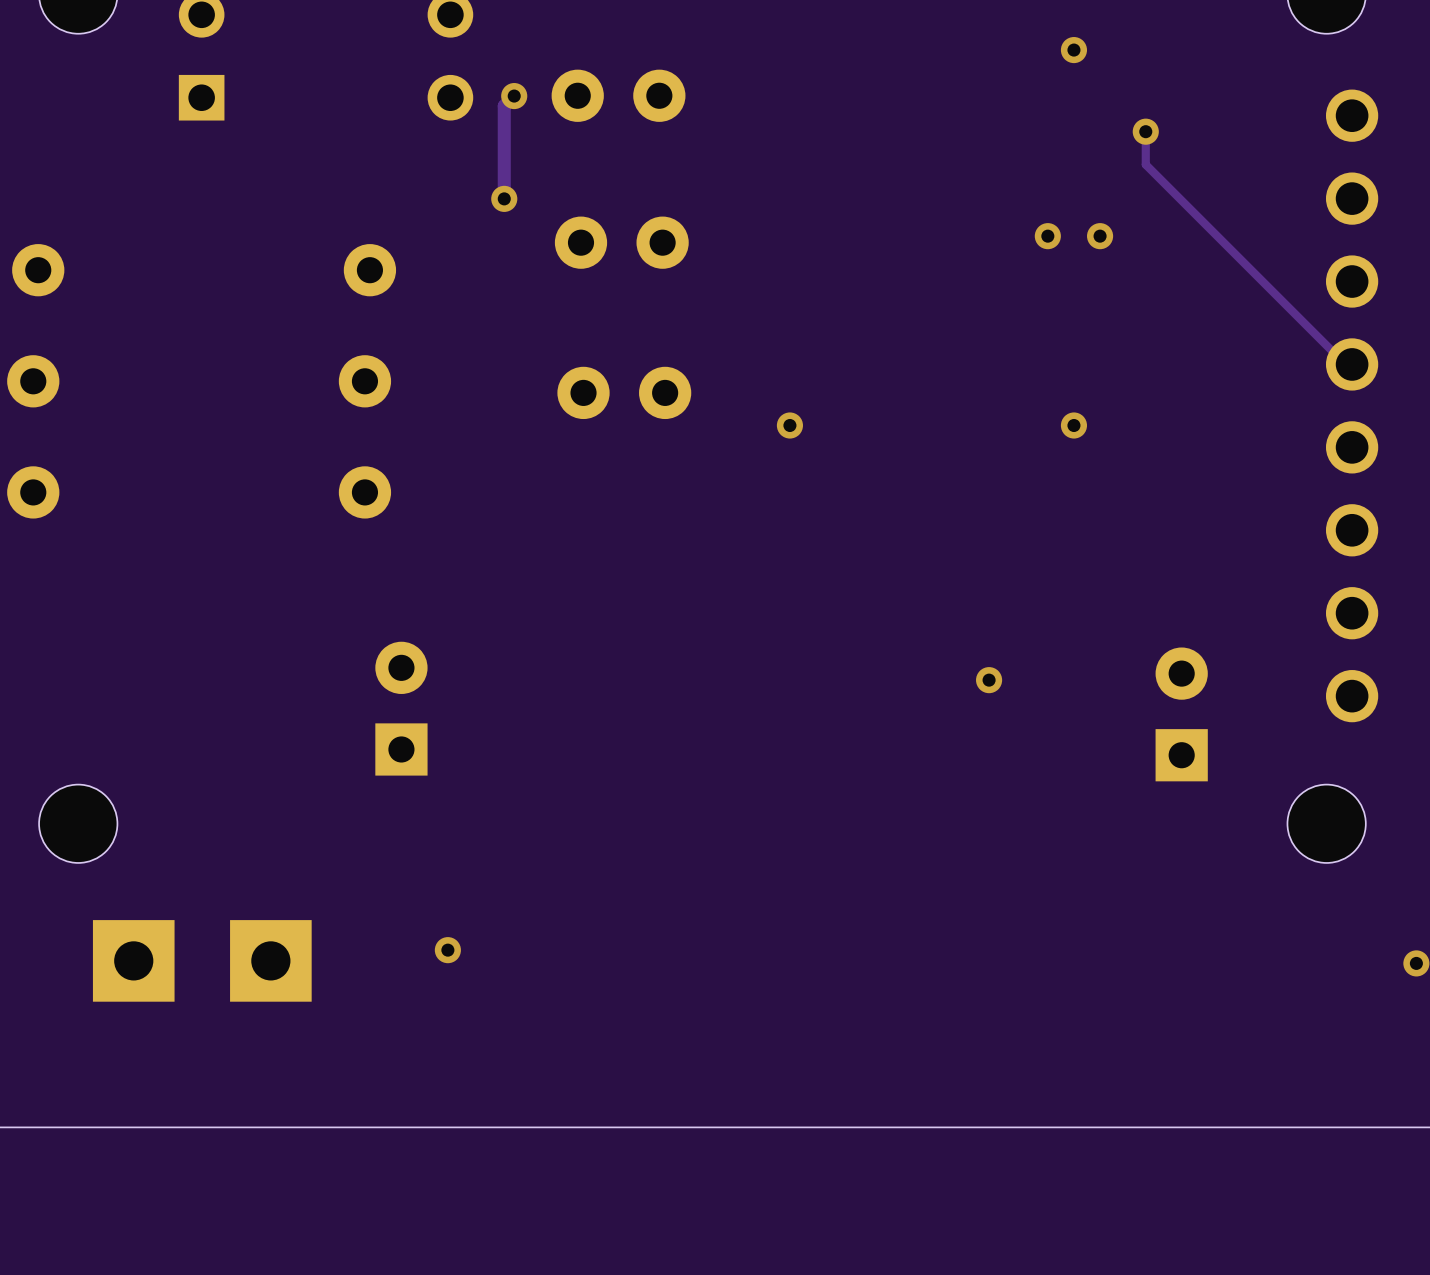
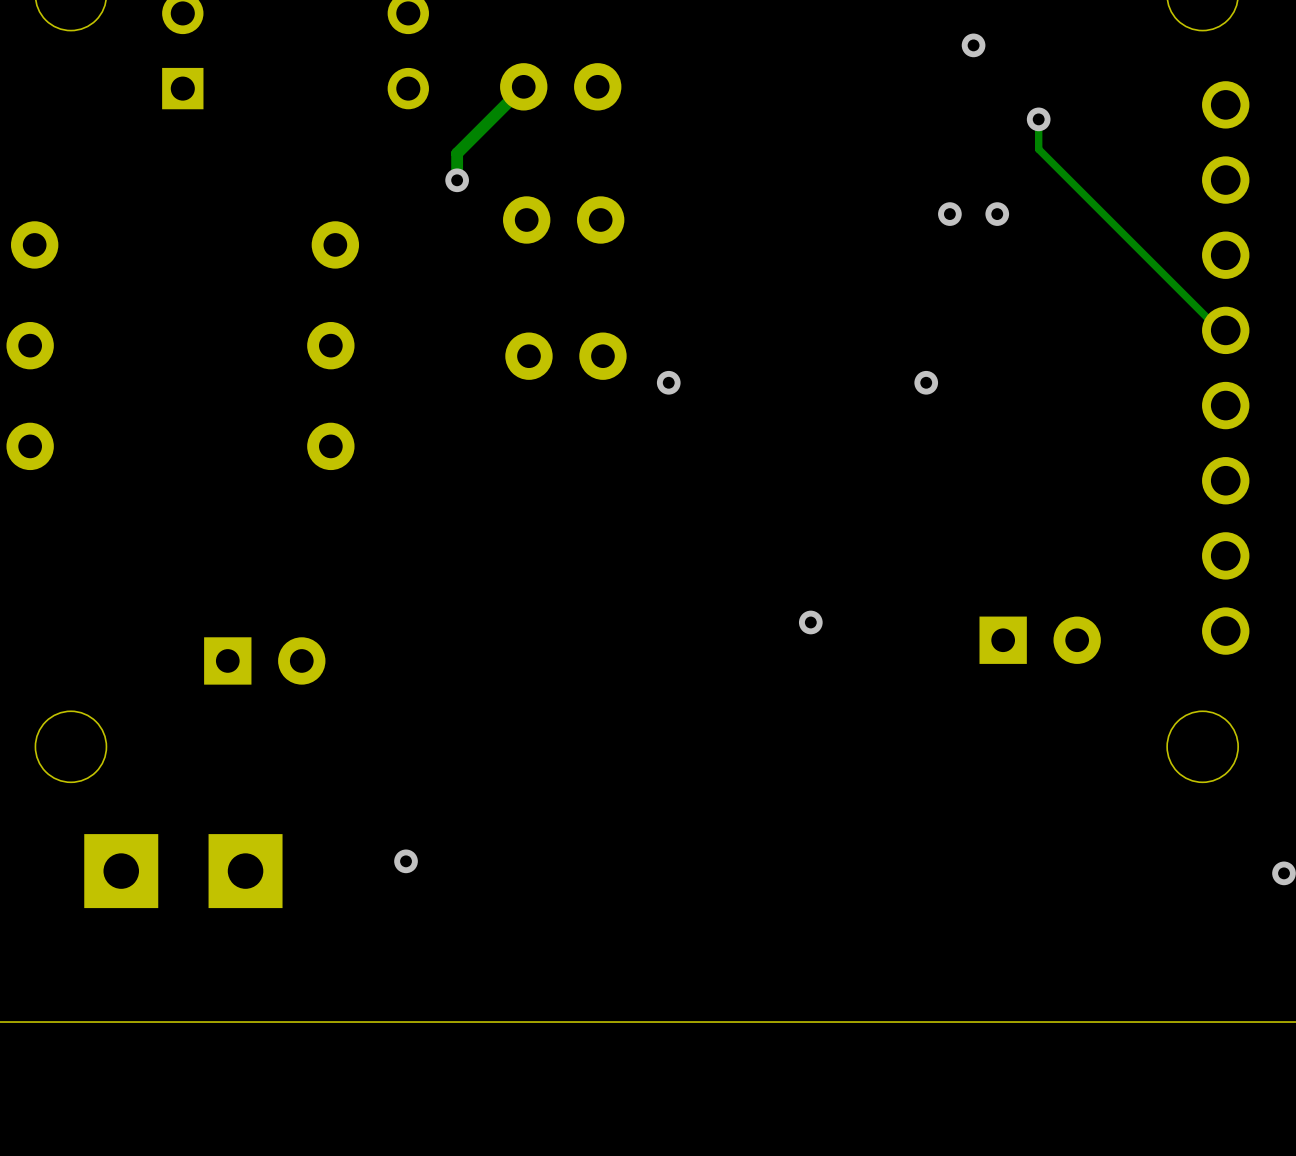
track: (514, 96) (504, 106) (504, 169) -> (523, 86) (457, 153)
via: (514, 96) -> none
via position: (789, 425) -> (668, 382)
via position: (1073, 425) -> (926, 382)
via position: (989, 680) -> (810, 622)
part rotation: 0° (401, 708) -> 90° clockwise (264, 660)
part position: (401, 708) -> (264, 660)
part rotation: 0° (1181, 714) -> 90° clockwise (1040, 640)

